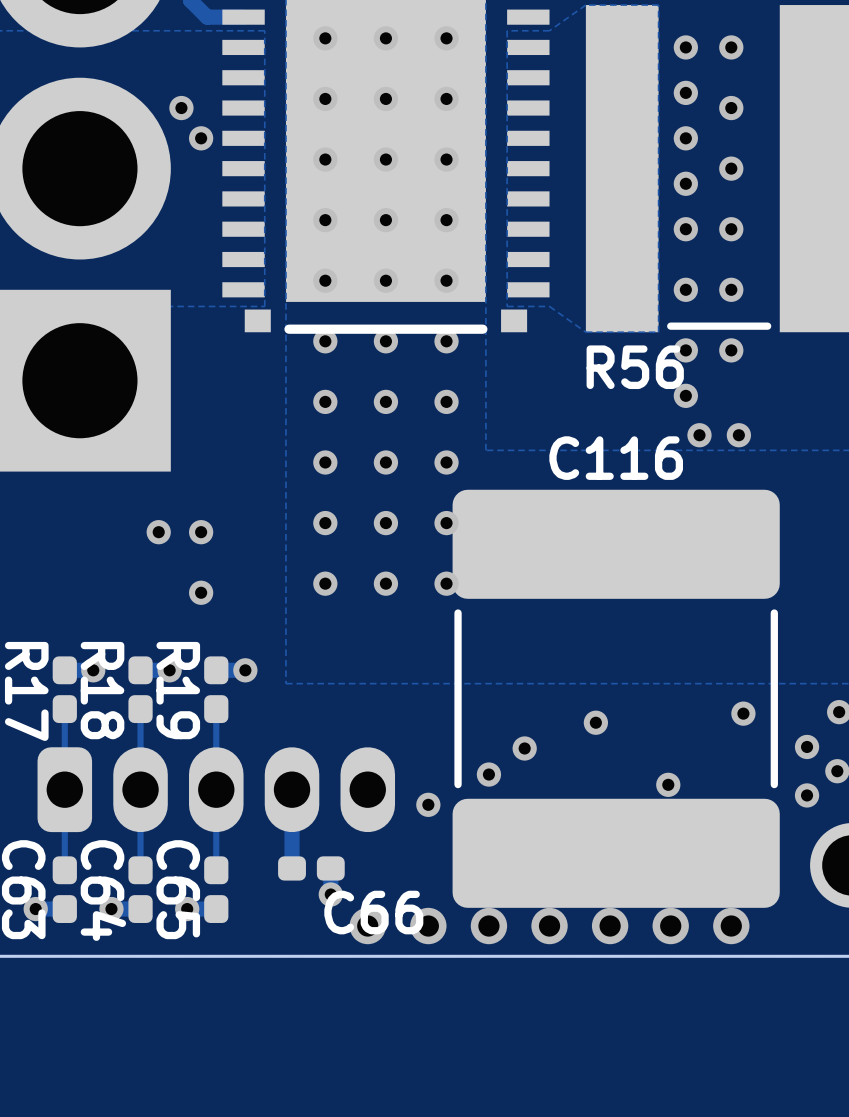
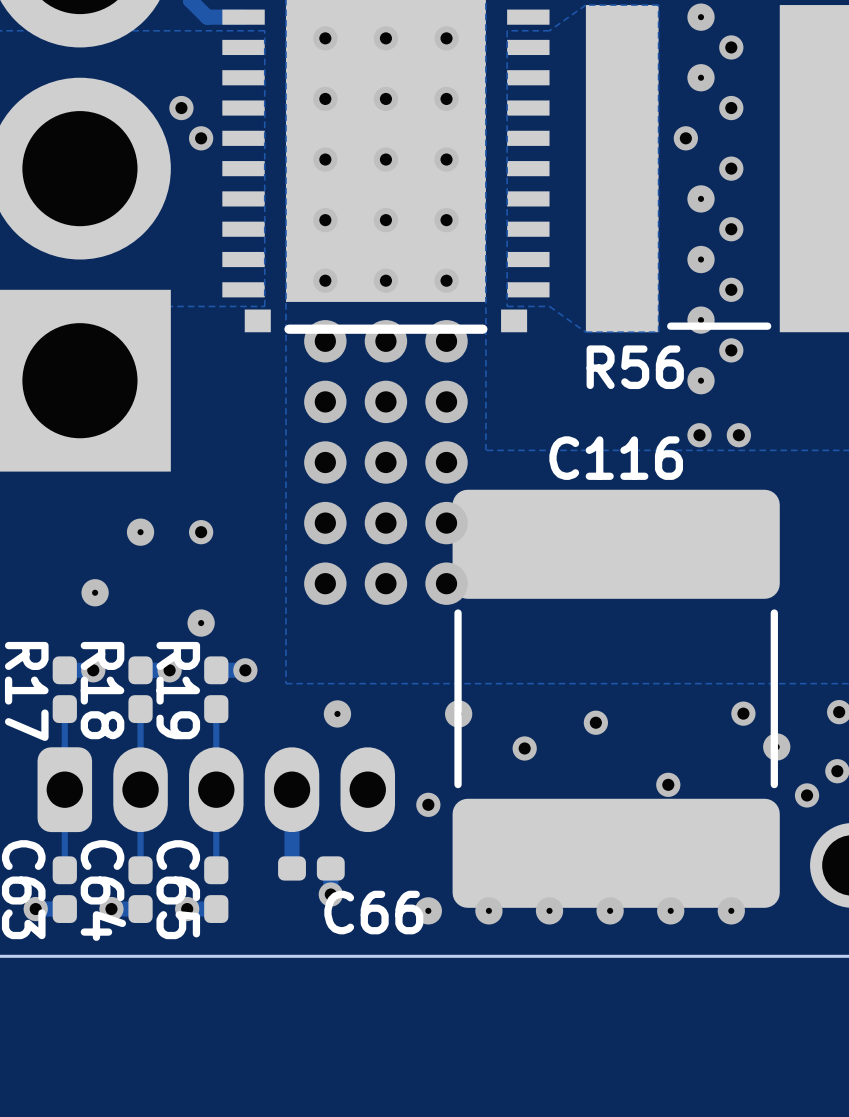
via: none -> (701, 17)
via: (685, 47) -> none
via position: (685, 92) -> (701, 77)
via position: (685, 183) -> (701, 198)
via: (685, 229) -> none
via: none -> (701, 259)
via: (685, 289) -> none
via: none -> (701, 320)
via size: [313, 329, 338, 354] -> [304, 320, 347, 363]
via size: [373, 329, 399, 354] -> [364, 320, 408, 363]
via size: [434, 329, 459, 354] -> [425, 320, 468, 363]
via: (685, 350) -> none
via size: [313, 389, 338, 415] -> [304, 380, 347, 424]
via size: [373, 389, 399, 415] -> [364, 380, 408, 424]
via size: [434, 389, 459, 415] -> [425, 380, 468, 424]
via position: (685, 395) -> (701, 380)
via size: [313, 450, 338, 475] -> [304, 441, 347, 484]
via size: [373, 450, 399, 475] -> [364, 441, 408, 484]
via size: [434, 450, 459, 475] -> [425, 441, 468, 484]
via size: [313, 510, 338, 536] -> [304, 501, 347, 545]
via size: [373, 510, 399, 536] -> [364, 501, 408, 545]
via size: [434, 510, 459, 536] -> [425, 501, 468, 545]
via position: (158, 532) -> (140, 532)
via size: [313, 571, 338, 596] -> [304, 562, 347, 605]
via size: [373, 571, 399, 596] -> [364, 562, 408, 605]
via size: [434, 571, 459, 596] -> [425, 562, 468, 605]
via: none -> (95, 592)
via: (201, 592) -> none
via: none -> (201, 623)
via: none -> (337, 713)
via: none -> (458, 713)
via: none -> (776, 746)
via: (807, 746) -> none
via: (488, 774) -> none
via size: [410, 907, 447, 945] -> [414, 897, 442, 925]
via size: [470, 907, 508, 945] -> [475, 897, 503, 925]
via size: [531, 907, 568, 945] -> [535, 897, 564, 925]
via size: [591, 907, 629, 945] -> [596, 897, 624, 925]
via size: [652, 907, 689, 945] -> [657, 897, 685, 925]
via size: [713, 907, 750, 945] -> [717, 897, 745, 925]
via: (367, 926) -> none

